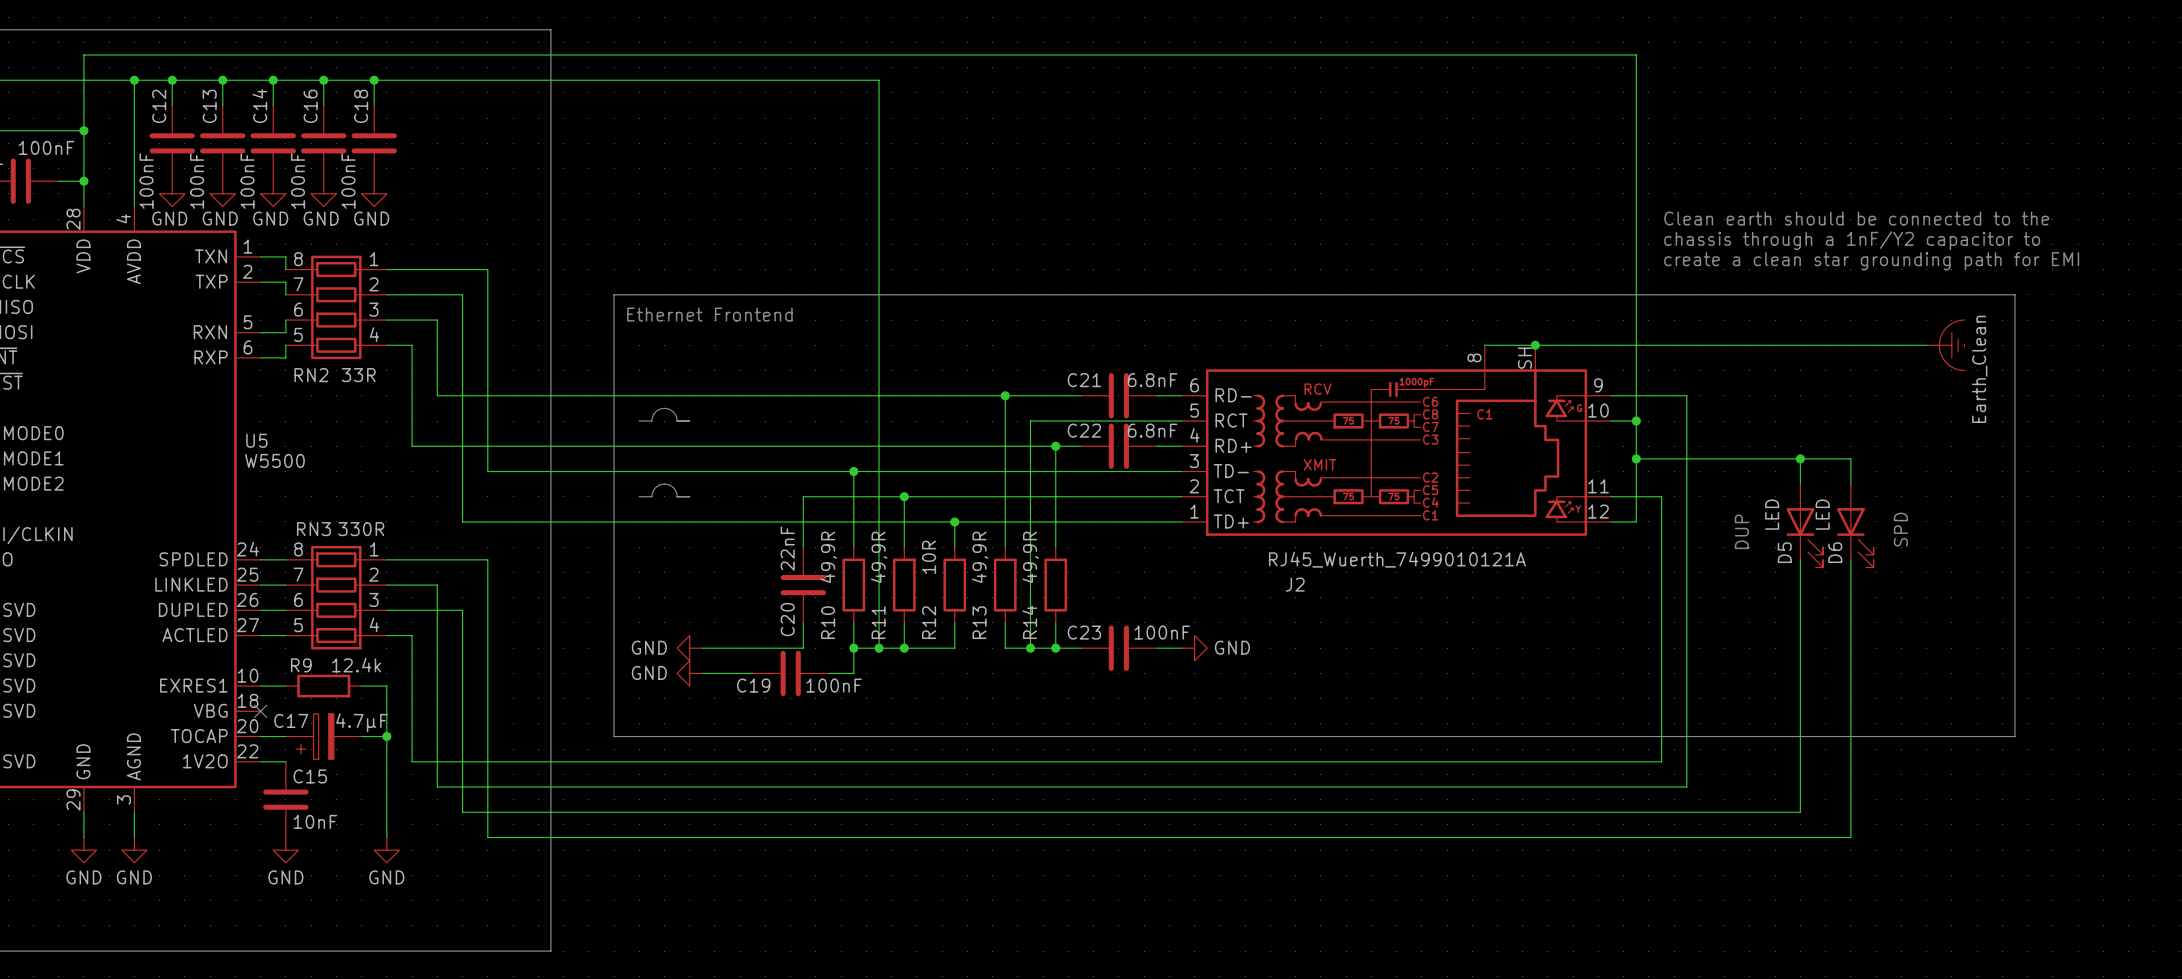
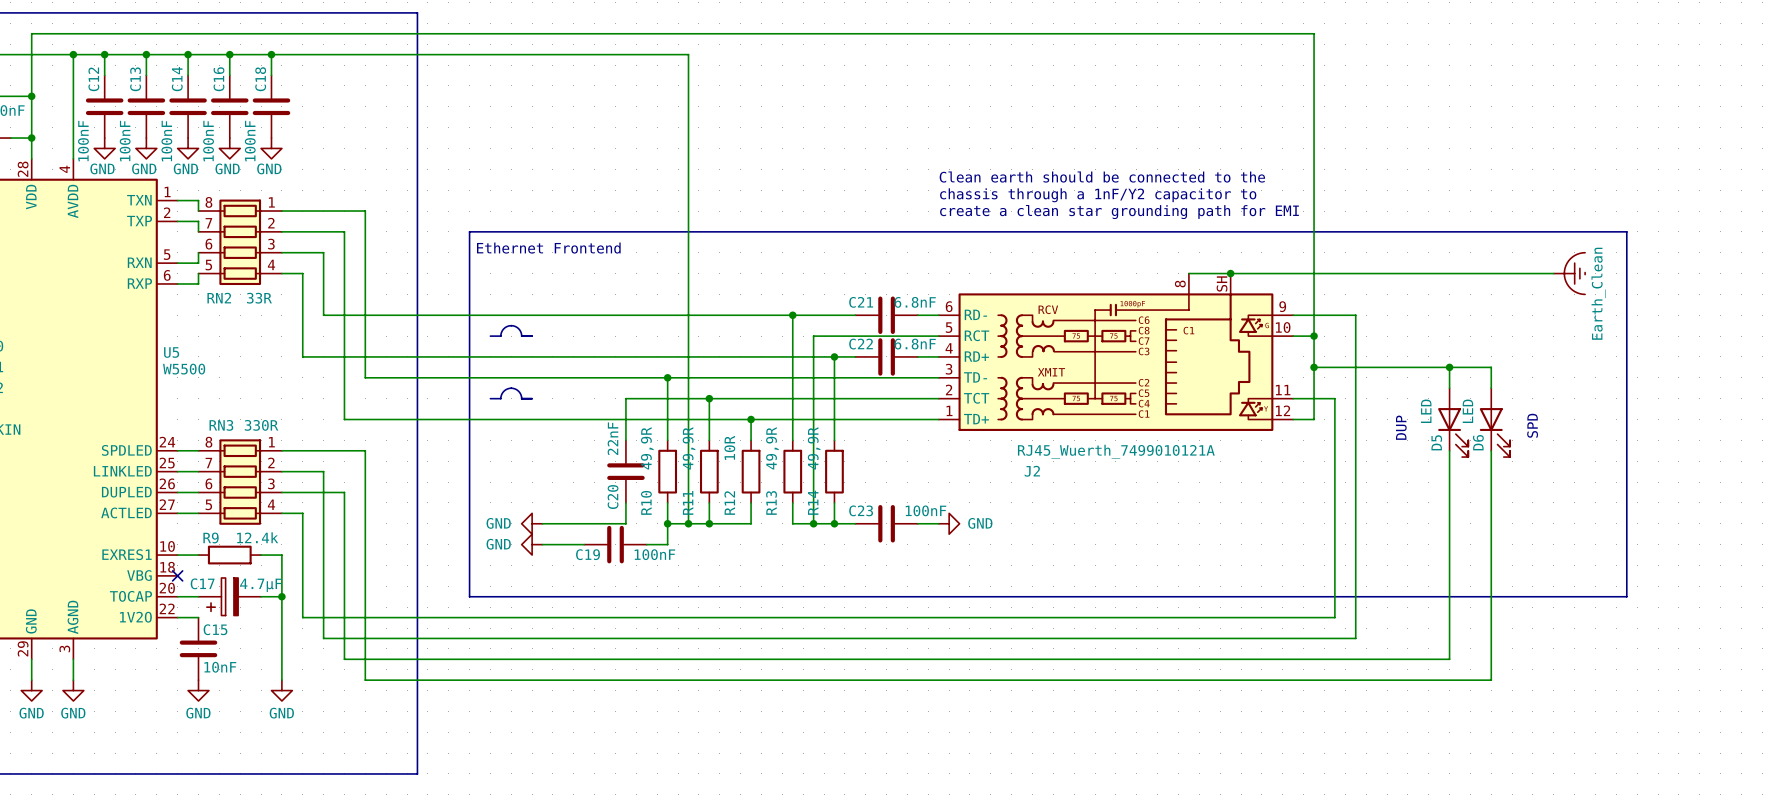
text: Clean earth should be connected to the (1856, 218) -> none
text: none -> Clean earth should be connected to the (1102, 177)
text: chassis through a 1nF/Y2 capacitor to (1852, 240) -> none
text: none -> chassis through a 1nF/Y2 capacitor to (1098, 195)
text: create a clean star grounding path for EMI (1871, 261) -> none
text: none -> create a clean star grounding path for EMI (1119, 212)

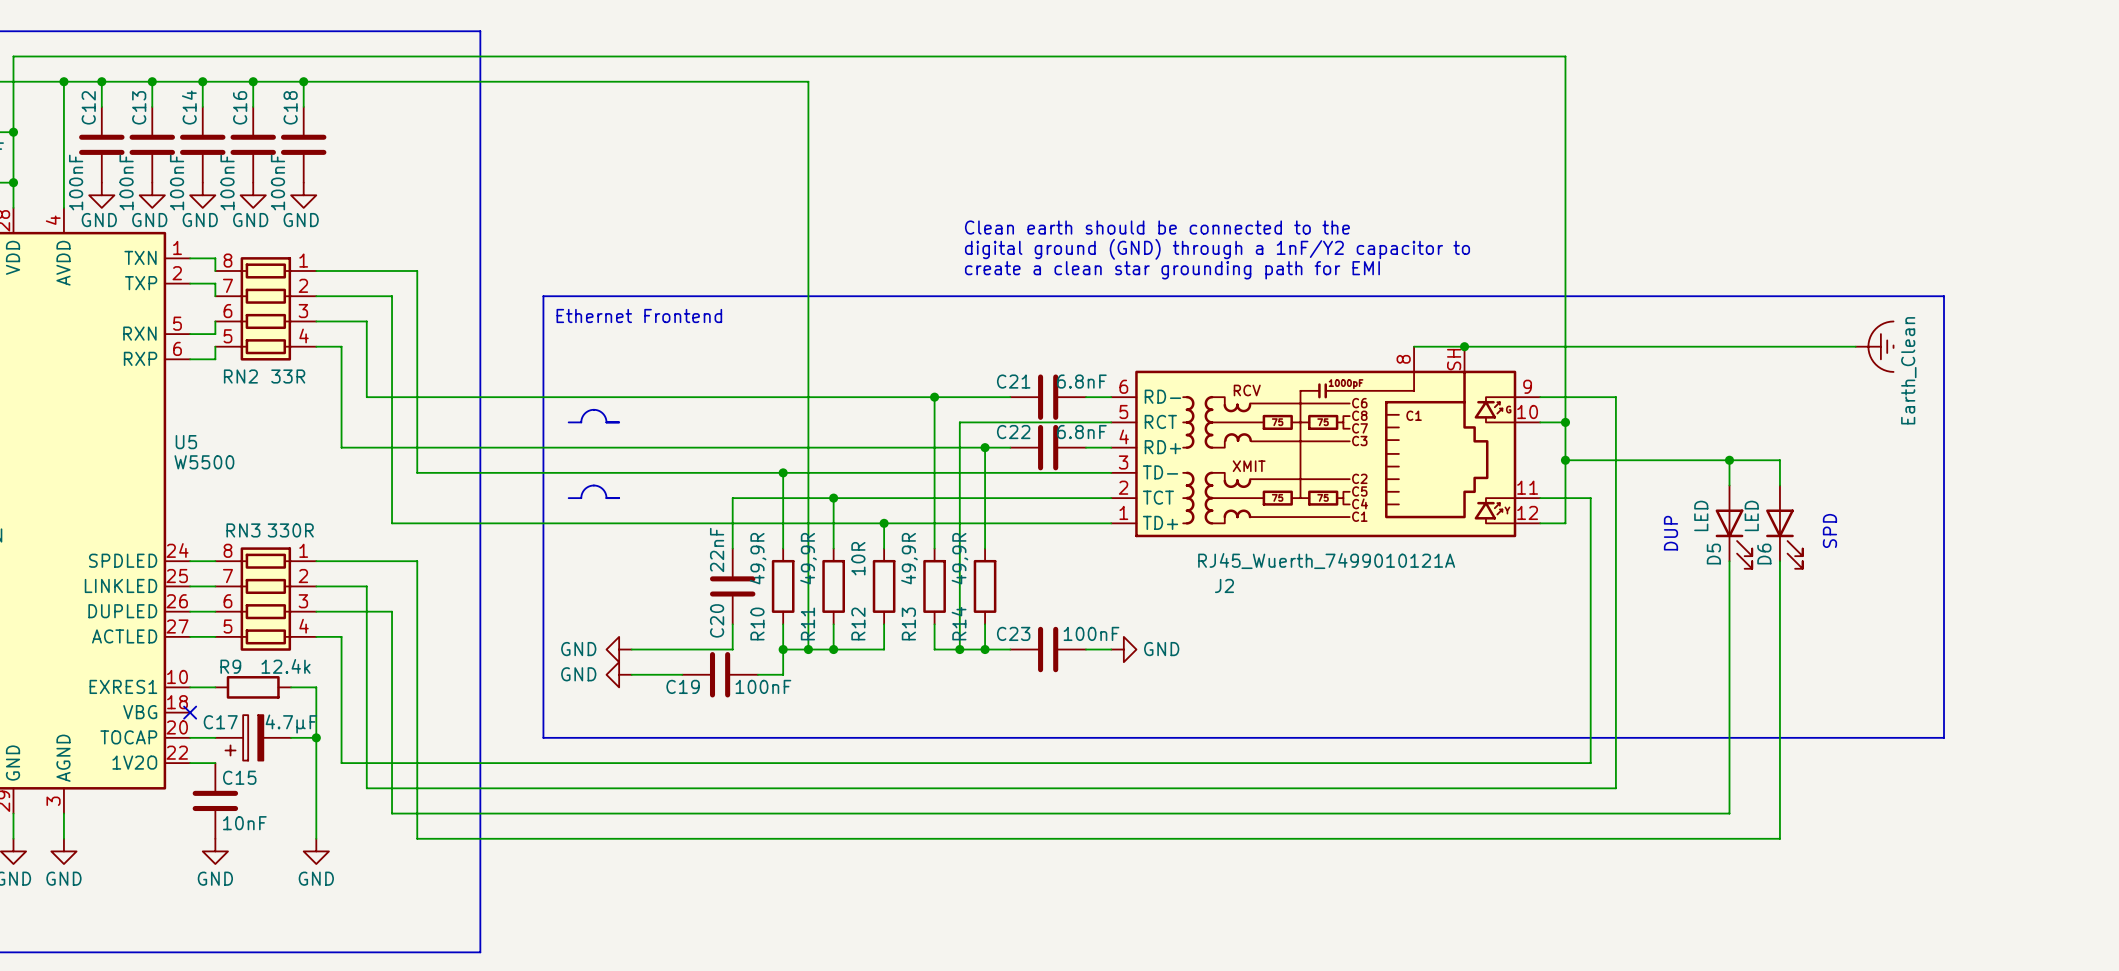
text position: Clean earth should be connected to the (1102, 177) -> Clean earth should be connected to the (1157, 227)
text: chassis through a 1nF/Y2 capacitor to (1098, 195) -> digital ground (GND) through a 1nF/Y2 capacitor to (1217, 249)
text position: create a clean star grounding path for EMI (1119, 212) -> create a clean star grounding path for EMI (1172, 270)

